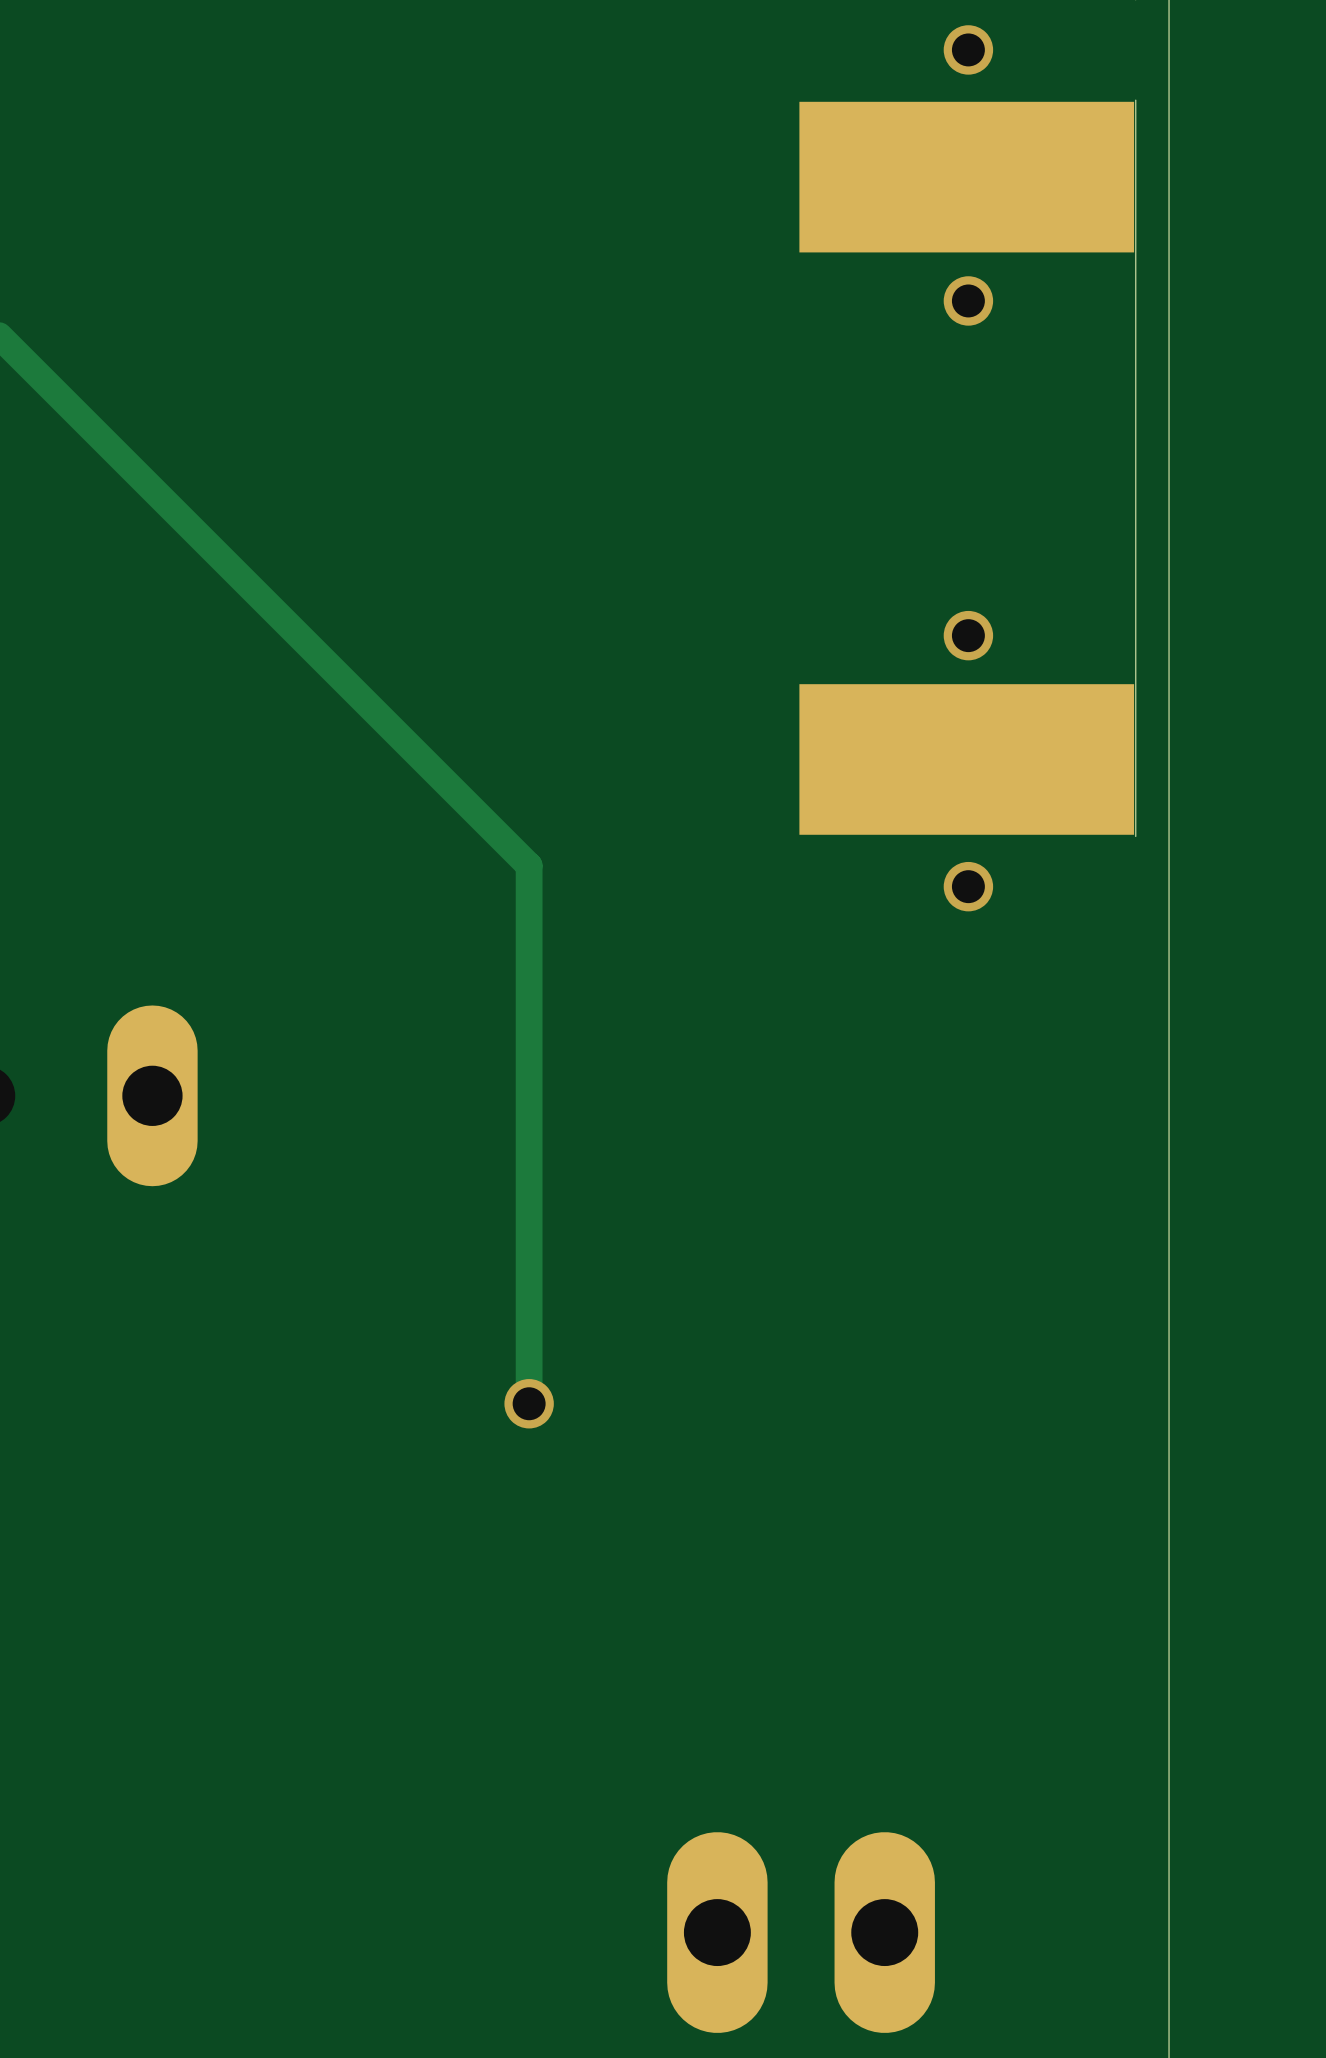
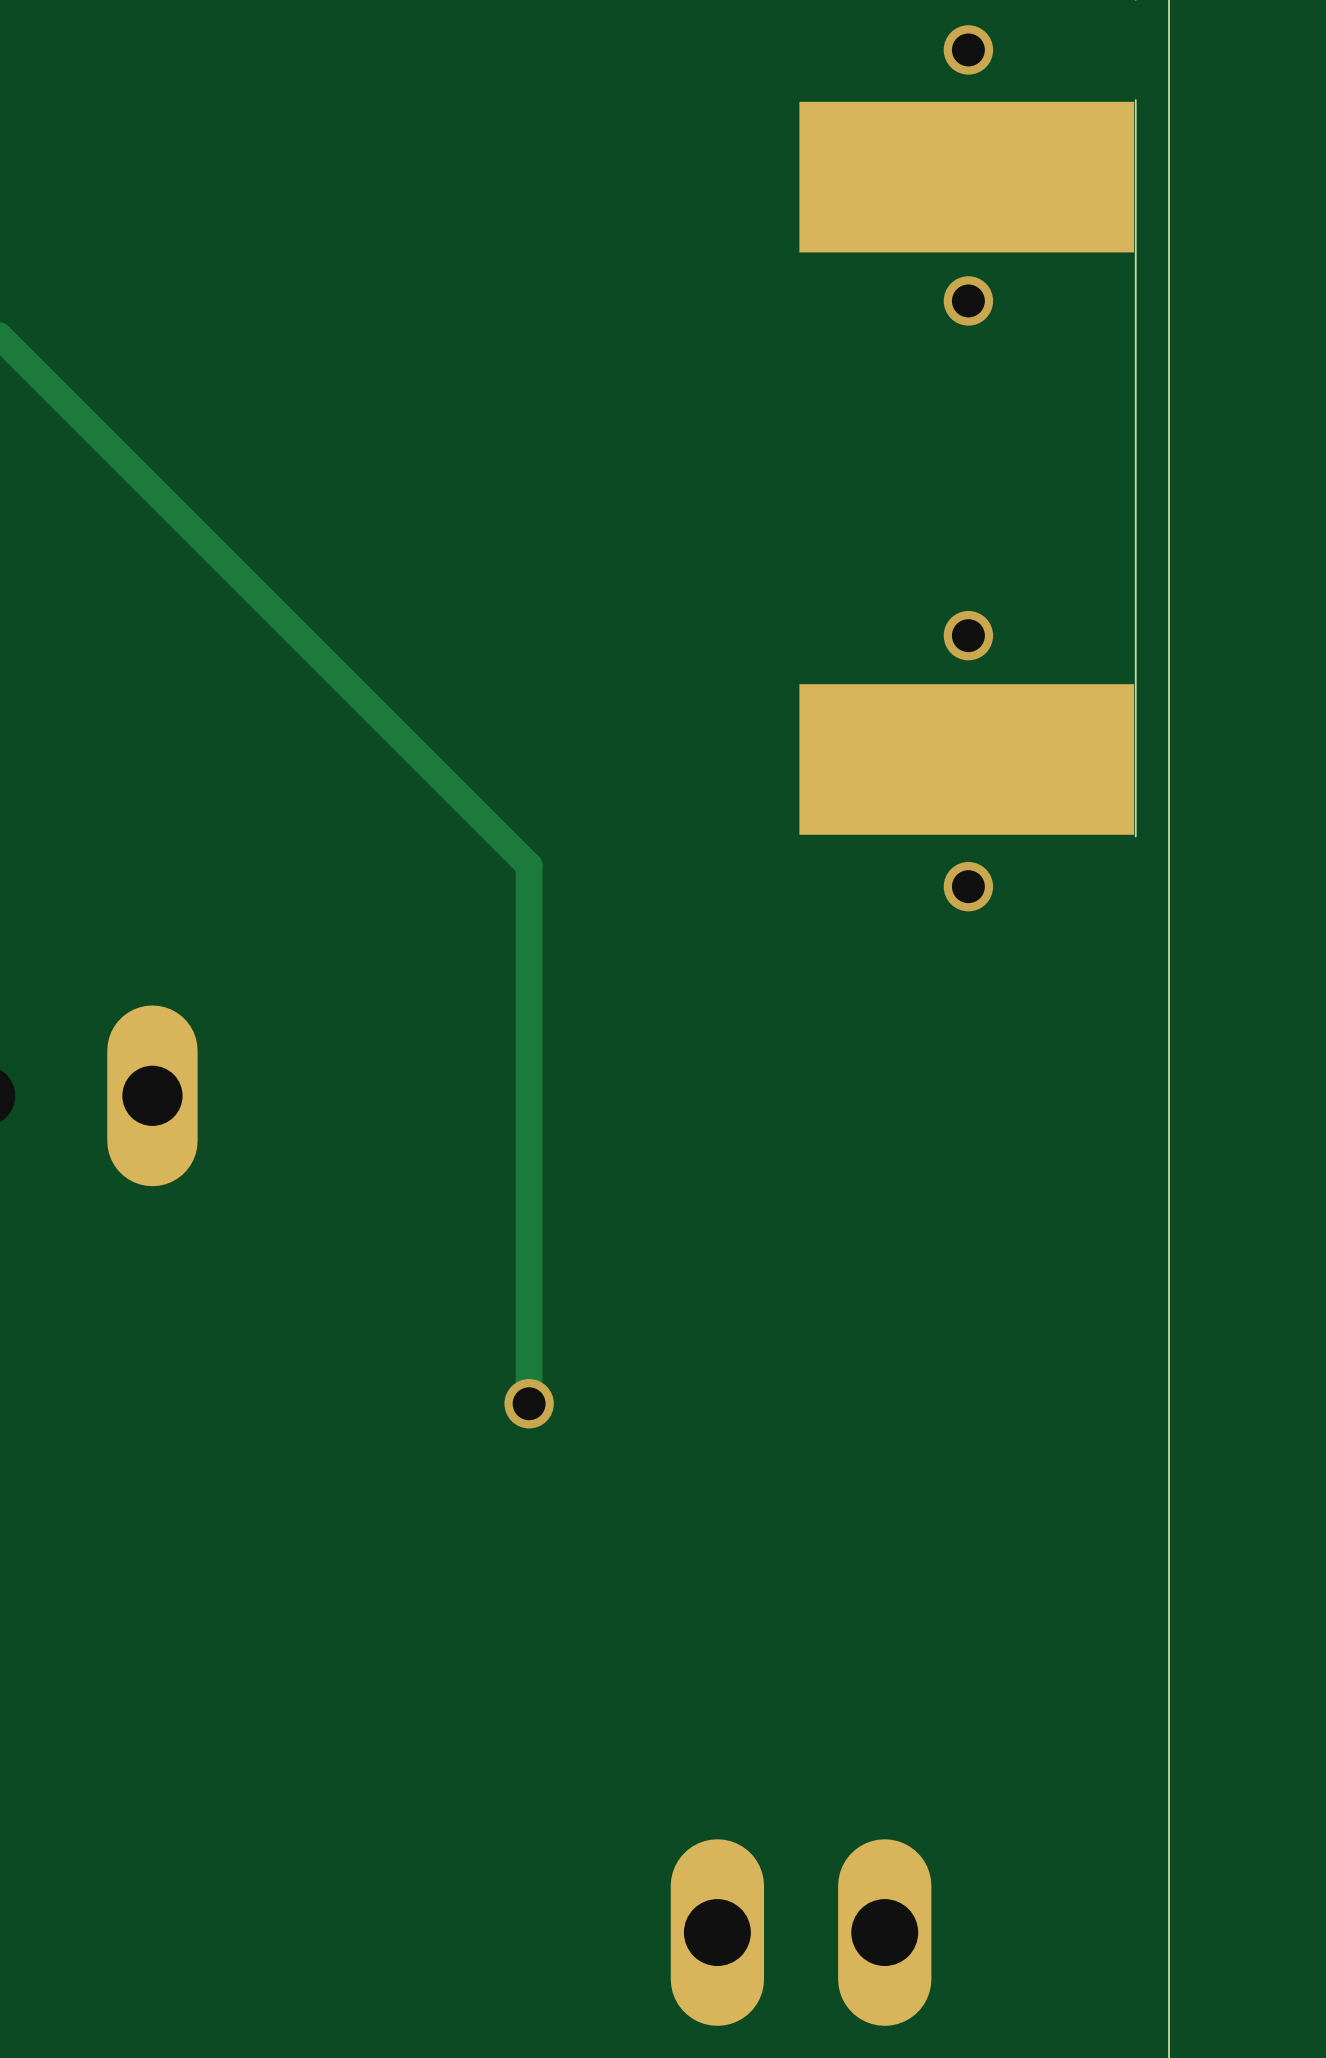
part footprint: [667, 1832, 935, 2033] -> [670, 1839, 932, 2026]

